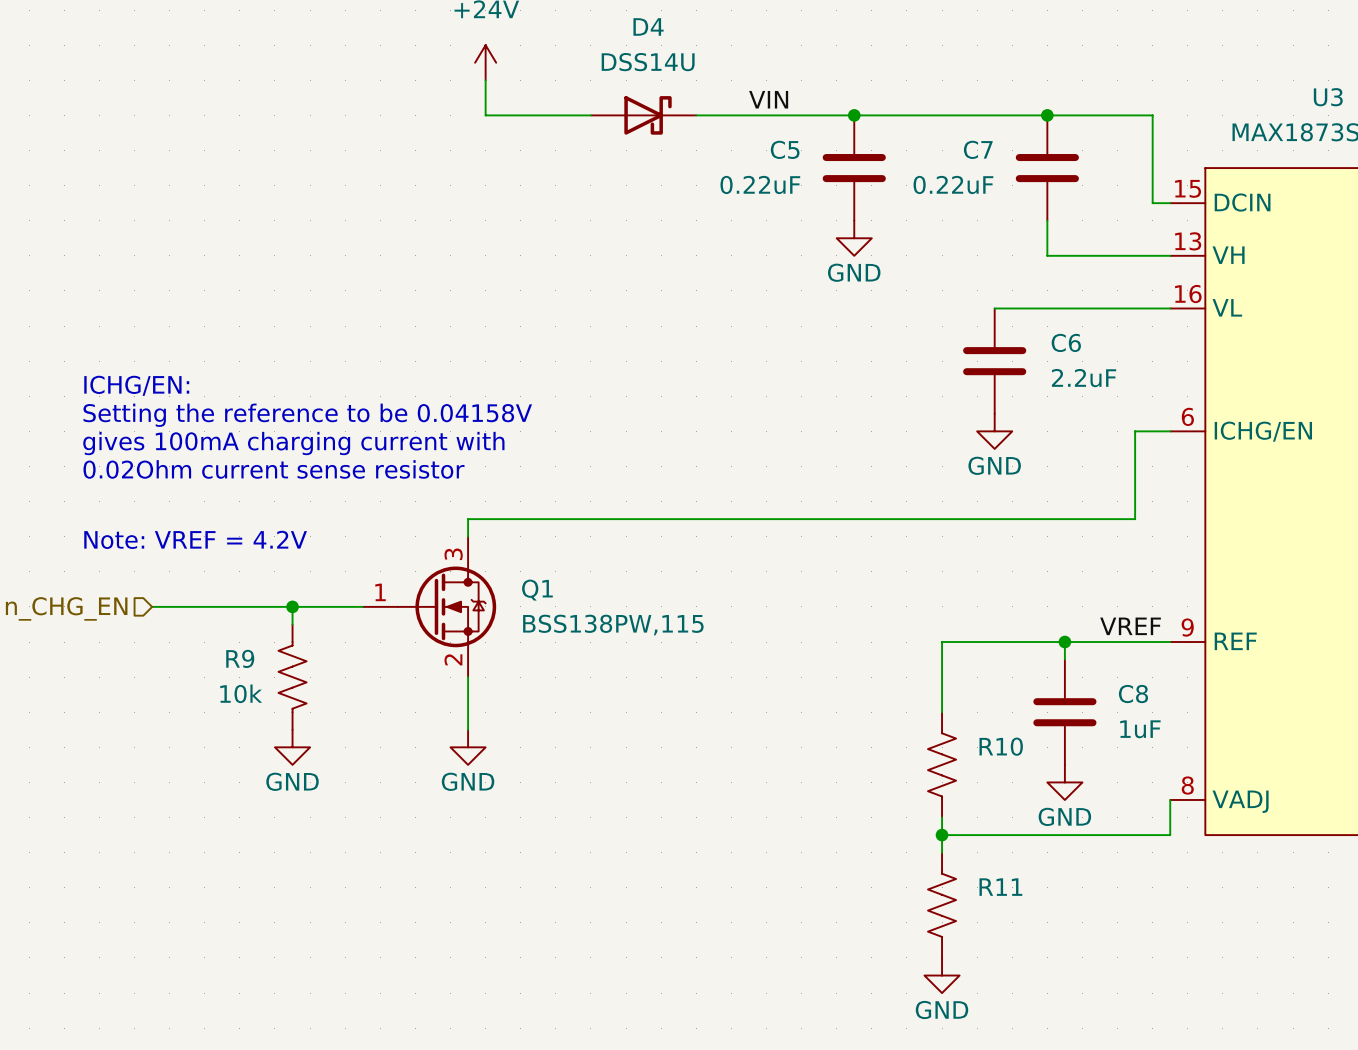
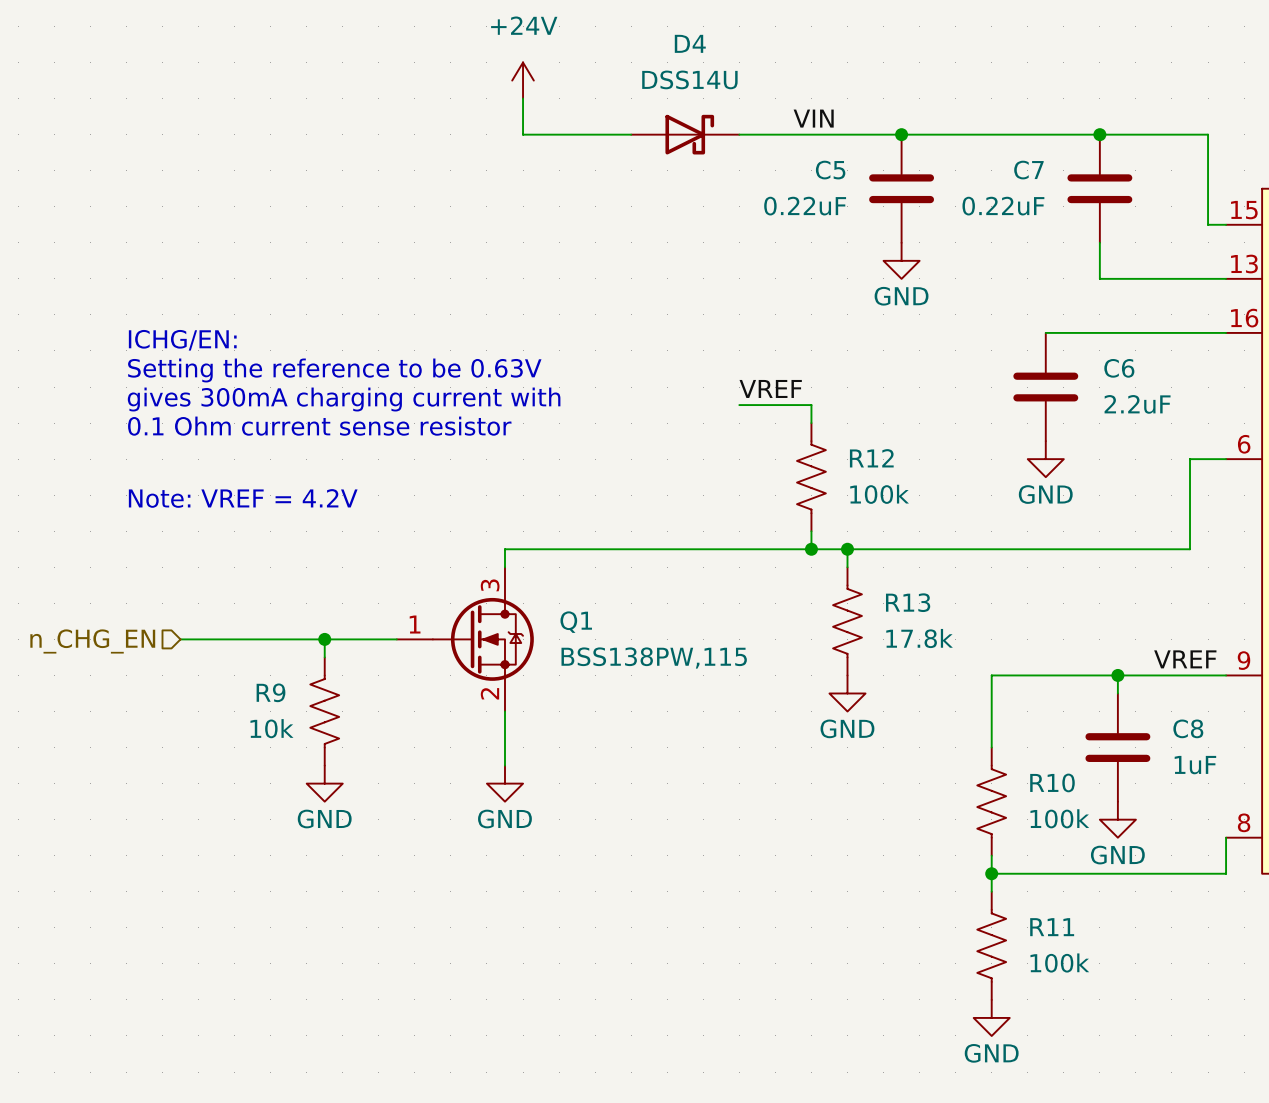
text: none -> Setting the reference to be 0.63V (334, 370)
label: none -> VREF (770, 388)
text: none -> gives 300mA charging current with (344, 399)
wire: none -> (739, 405) (811, 405) (811, 423)
text position: ICHG/EN: (136, 385) -> ICHG/EN: (182, 340)
text: none -> 0.1 Ohm current sense resistor (319, 426)
text: Setting the reference to be 0.04158V (307, 415) -> none
text: gives 100mA charging current with (293, 443) -> none
R12: none -> 100k (811, 477)
text: 0.02Ohm current sense resistor (273, 469) -> none
wire: none -> (811, 531) (811, 549)
junction: none -> (811, 549)
wire: none -> (847, 549) (847, 567)
junction: none -> (847, 549)
text position: Note: VREF = 4.2V (195, 539) -> Note: VREF = 4.2V (243, 498)
R13: none -> 17.8k (847, 621)
power symbol: none -> GND (847, 693)
R10 value: none -> 100k (1059, 818)
R11 value: none -> 100k (1059, 963)

